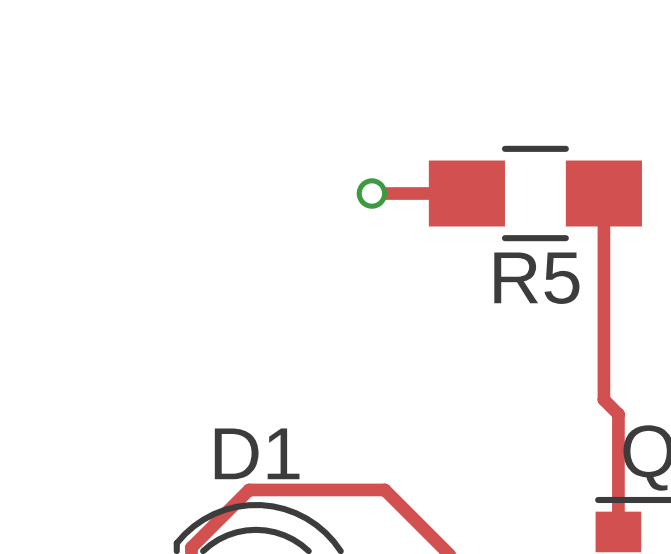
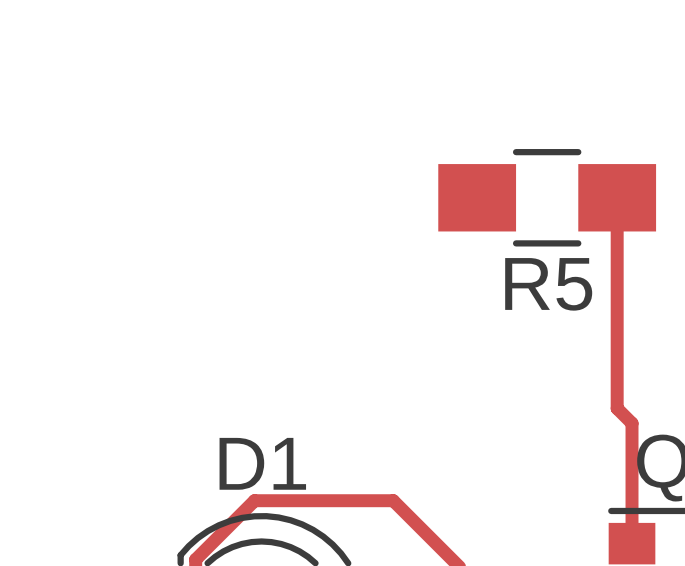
track: (371, 193) (466, 193) -> none
via: (371, 193) -> none

